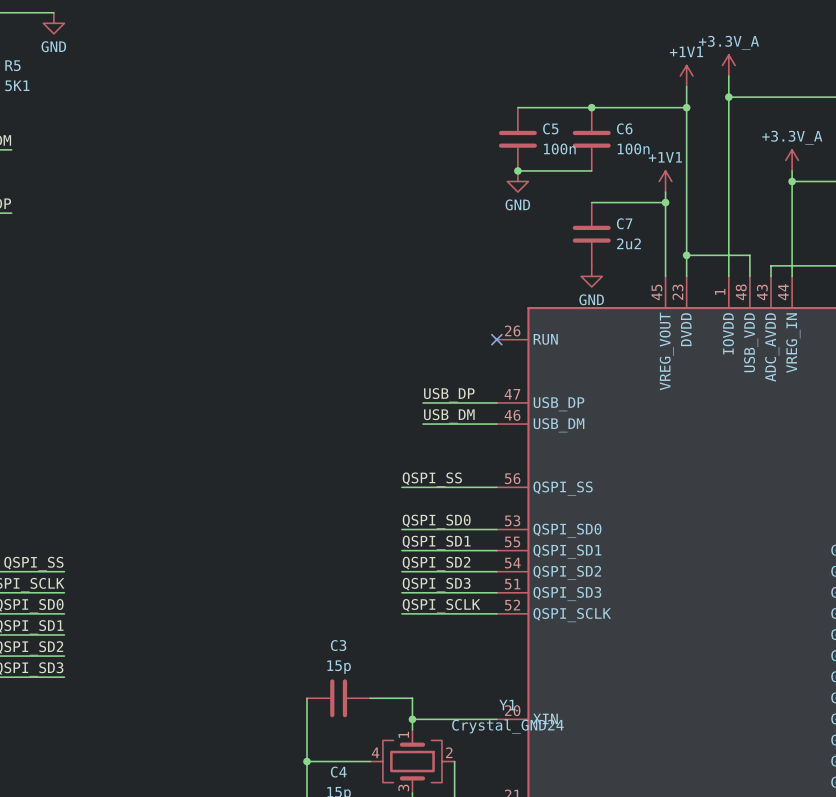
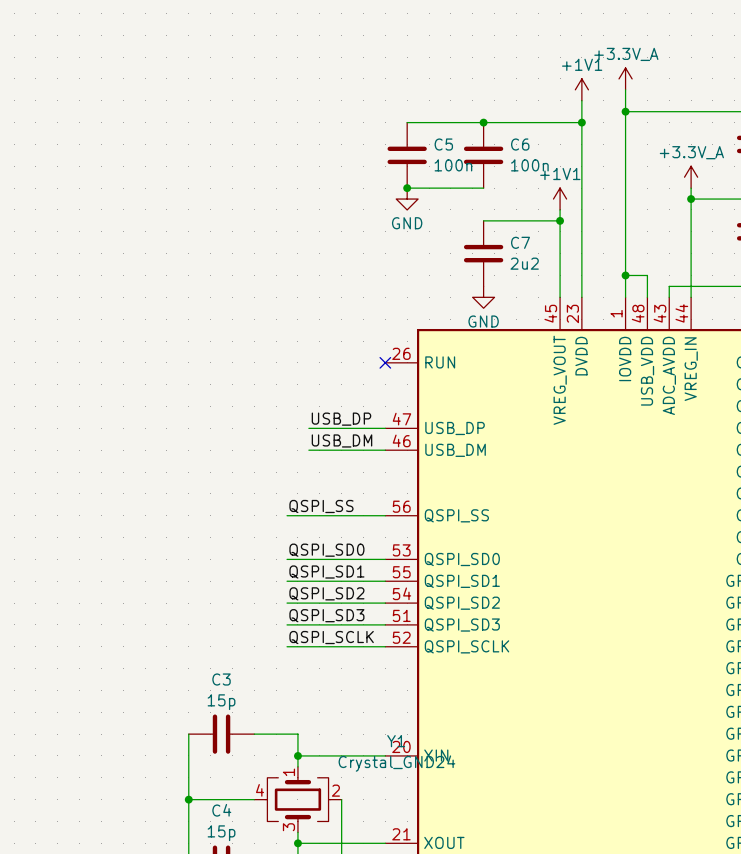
wire: (686, 255) (728, 255) -> none
junction position: (686, 255) -> (625, 275)

